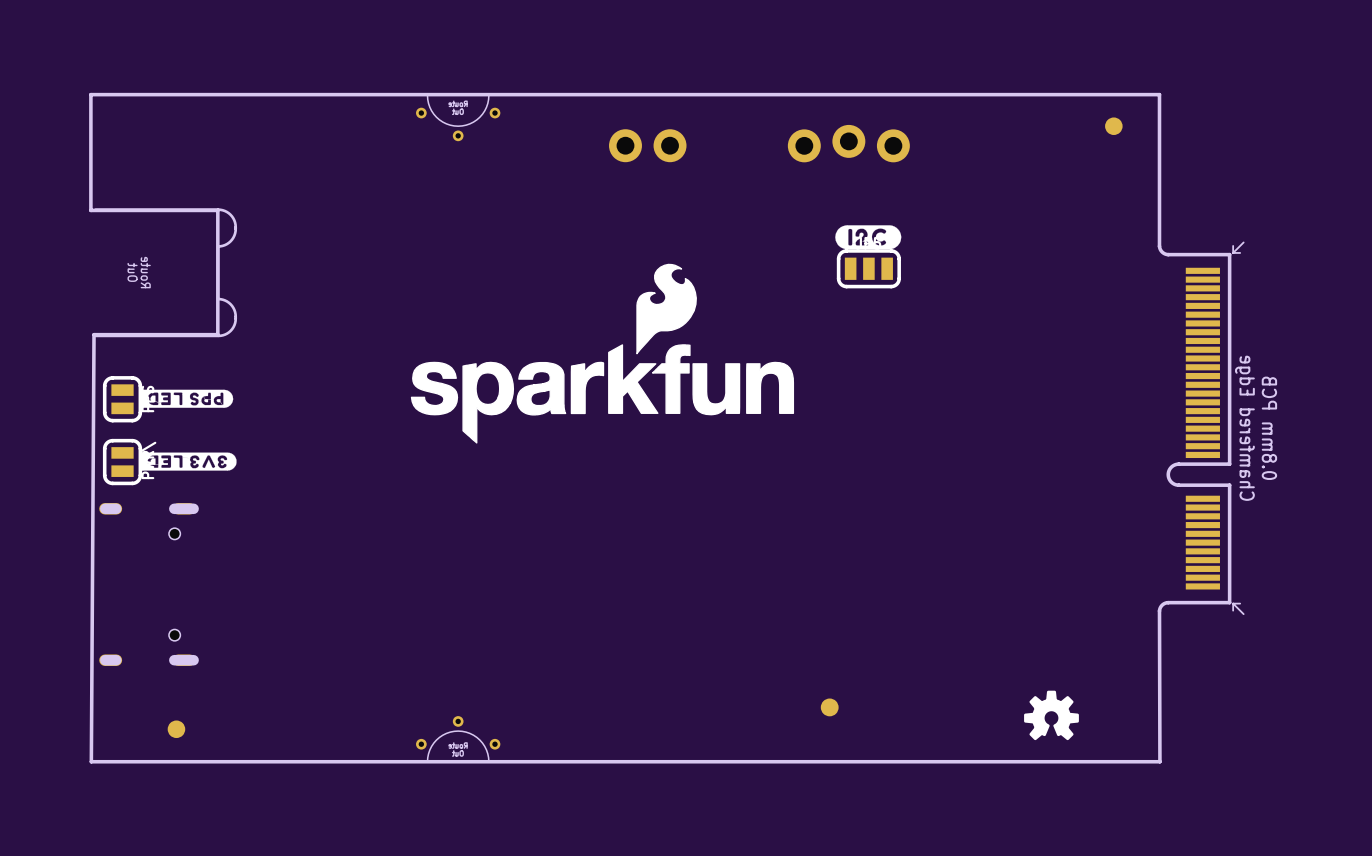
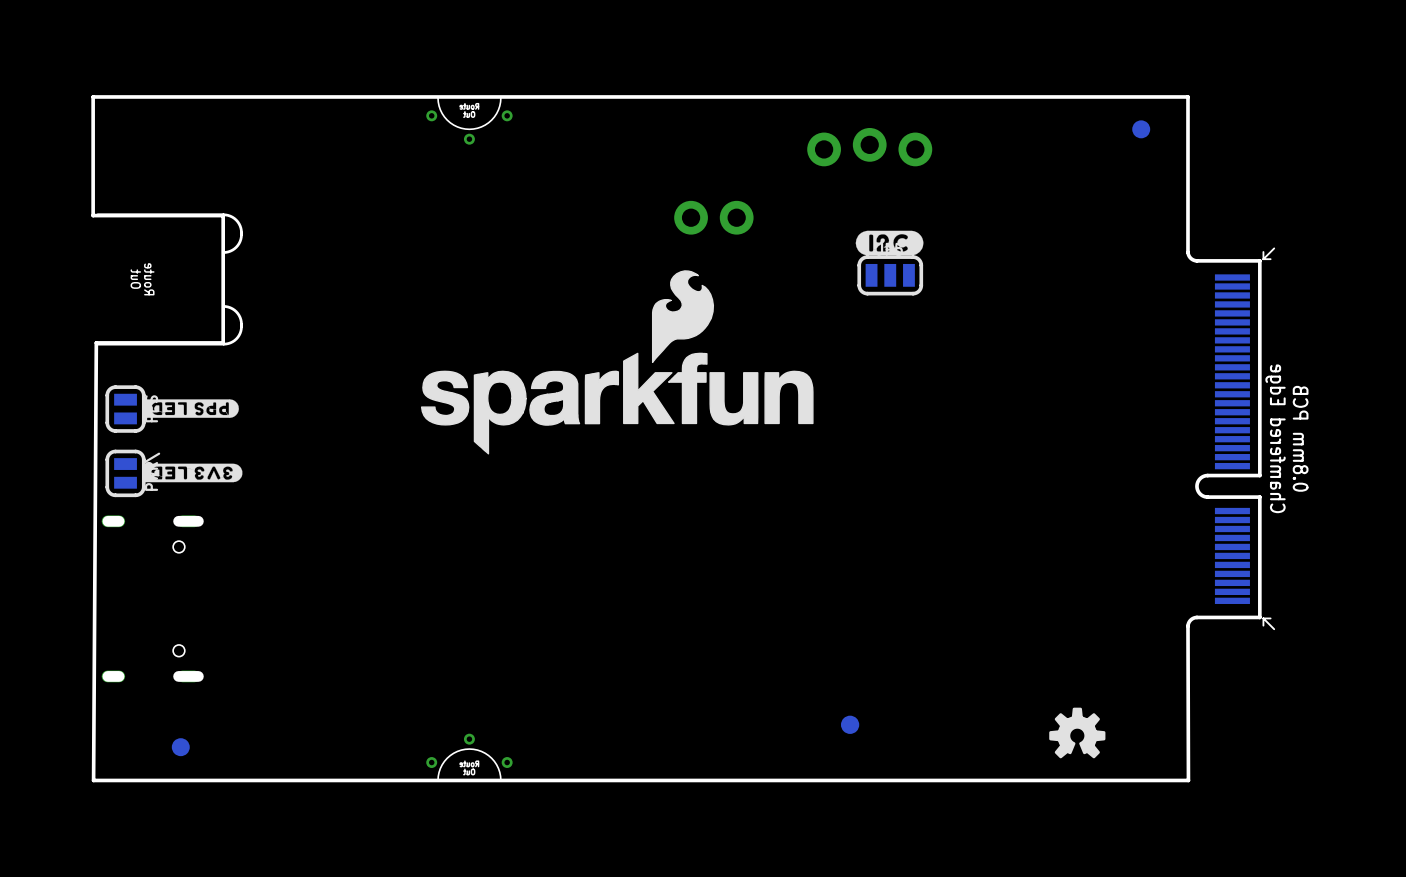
part position: (647, 145) -> (713, 217)

